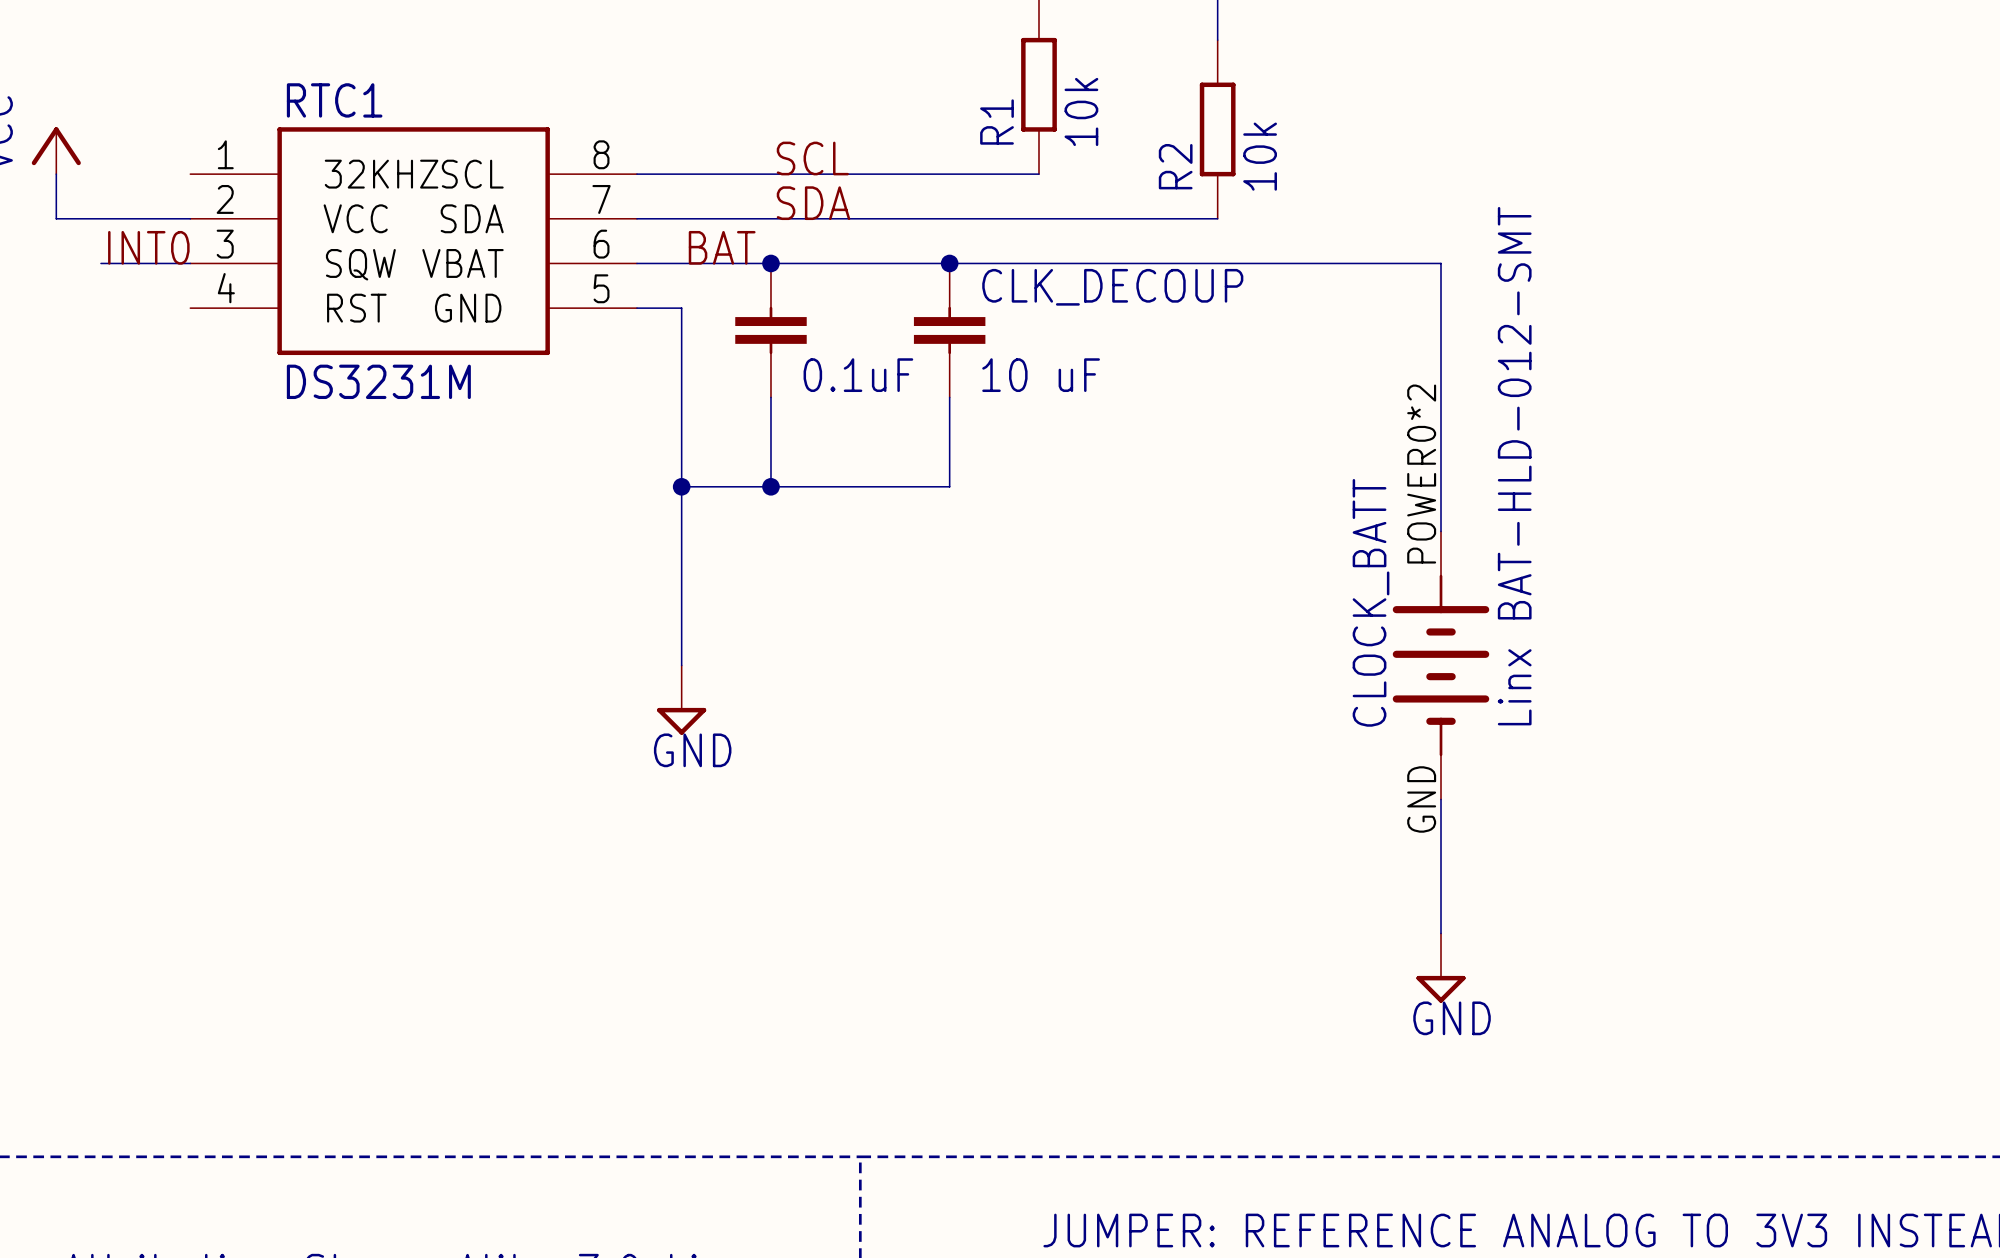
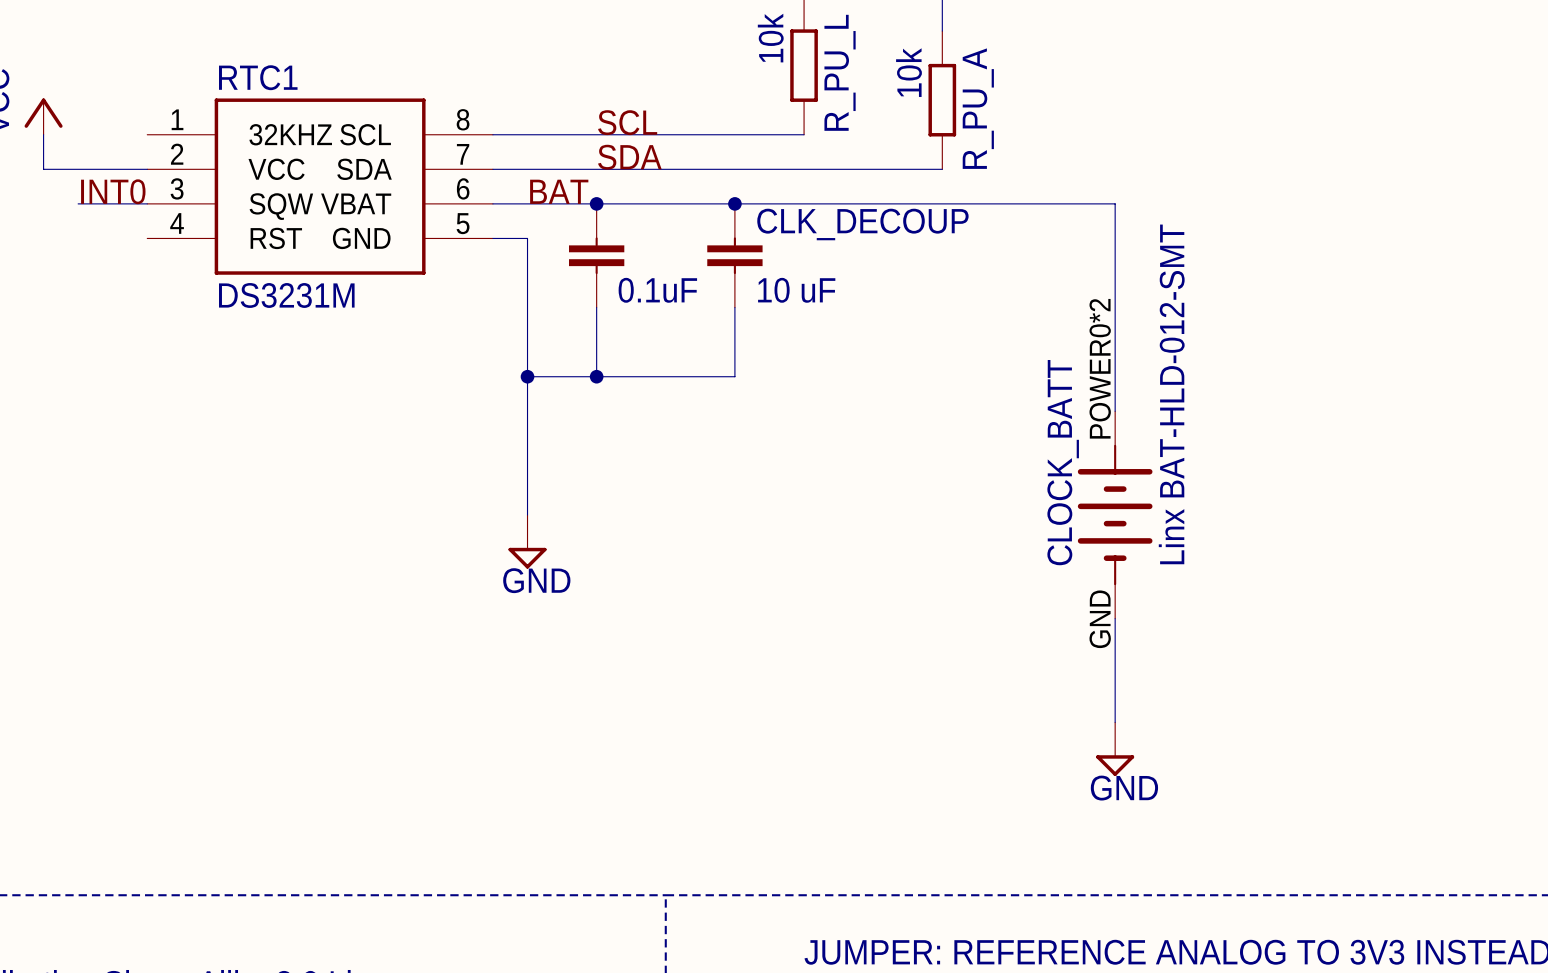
R1 value position: 10k (1081, 111) -> 10k (770, 38)
R1 name: R1 (997, 122) -> R_PU_L (840, 72)
R2 value position: 10k (1260, 156) -> 10k (909, 72)
R2 name: R2 (1175, 166) -> R_PU_A (978, 108)

